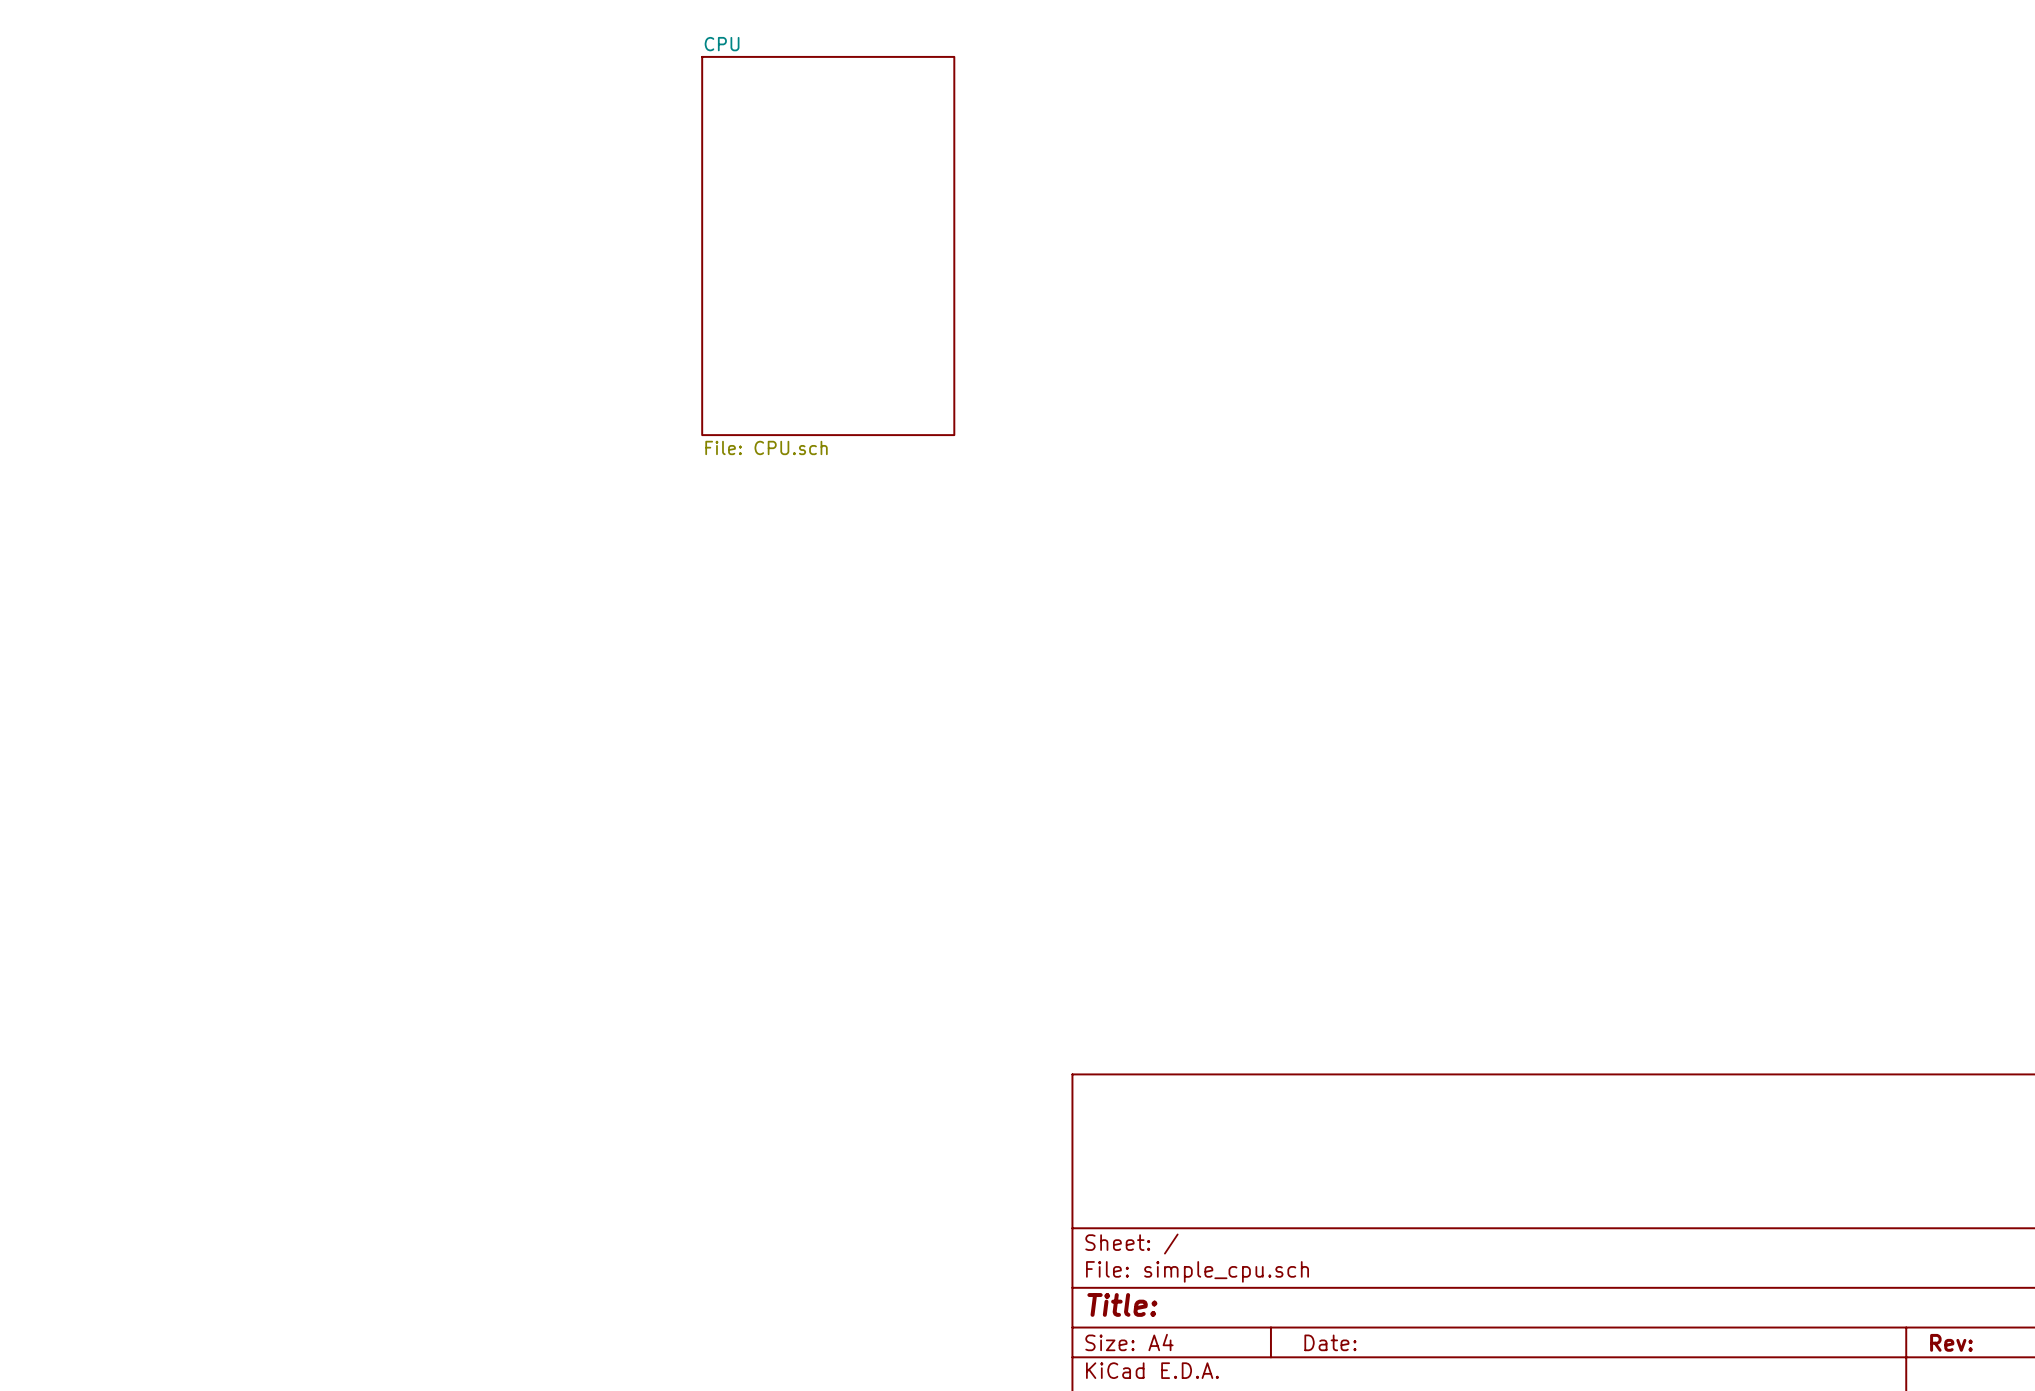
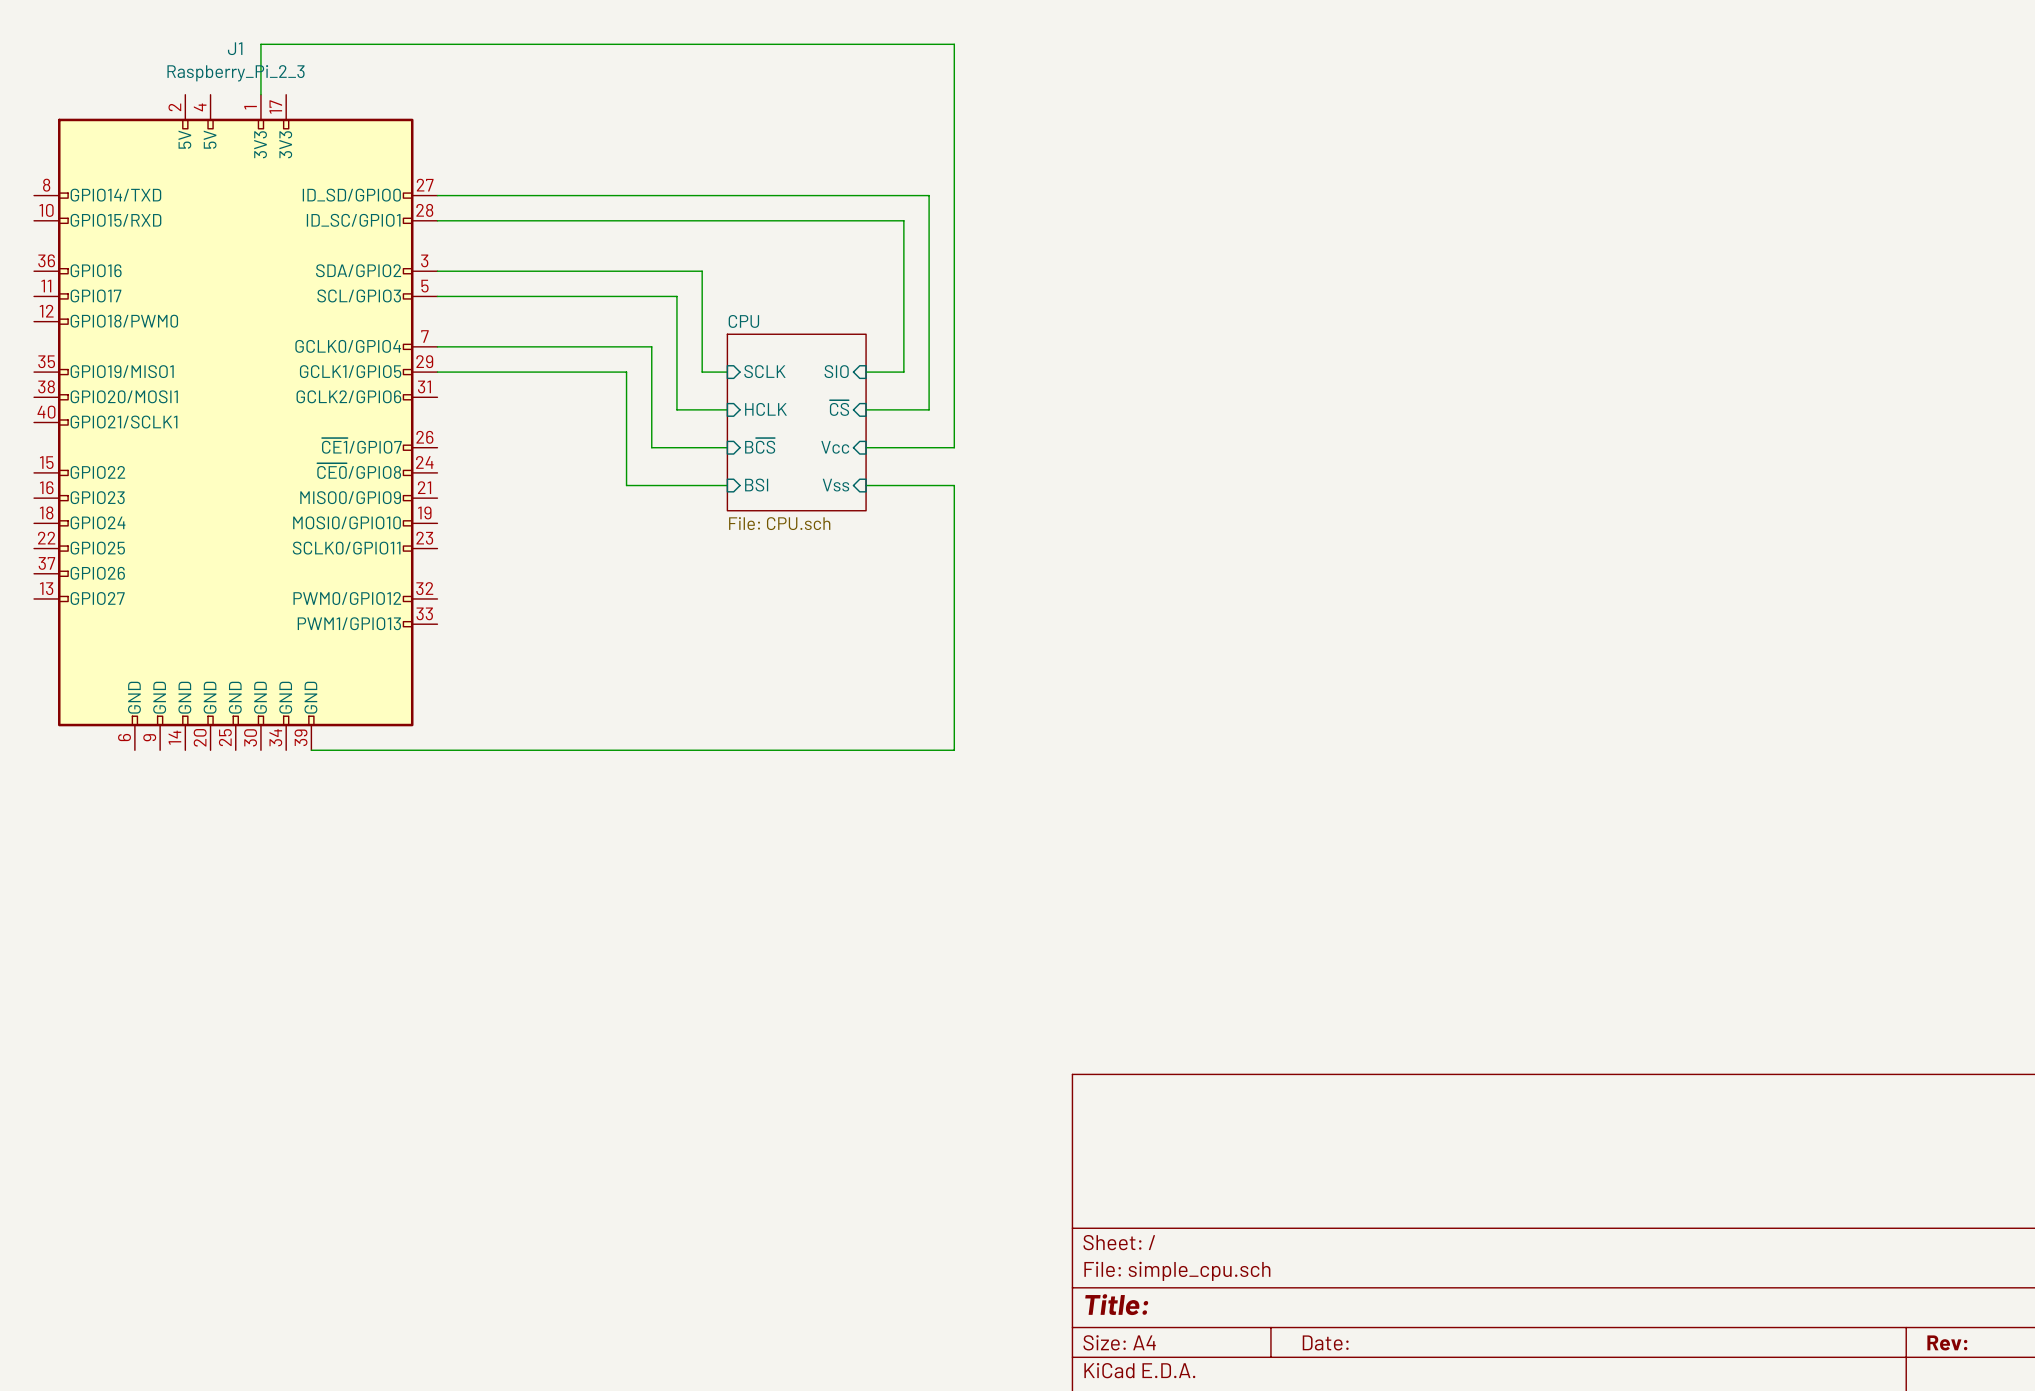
wire: none -> (260, 94) (260, 44) (954, 44) (954, 447) (866, 447)
wire: none -> (437, 195) (929, 195) (929, 409) (866, 409)
wire: none -> (437, 220) (903, 220) (903, 372) (866, 372)
sheet CPU: File: CPU.sch (828, 246) -> none
wire: none -> (437, 271) (702, 271) (702, 372) (727, 372)
wire: none -> (437, 296) (676, 296) (676, 409) (727, 409)
wire: none -> (437, 346) (651, 346) (651, 447) (727, 447)
sheet pin: none -> SCLK (764, 371)
sheet pin: none -> SIO (836, 371)
wire: none -> (437, 372) (626, 372) (626, 485) (727, 485)
sheet pin: none -> ~{CS} (839, 408)
sheet pin: none -> HCLK (765, 409)
J1: none -> Raspberry_Pi_2_3 (235, 422)
sheet CPU: none -> File: CPU.sch (796, 422)
sheet pin: none -> B~{CS} (760, 445)
sheet pin: none -> Vcc (835, 447)
sheet pin: none -> BSI (756, 485)
sheet pin: none -> Vss (835, 485)
wire: none -> (866, 485) (954, 485) (954, 750) (311, 750)

